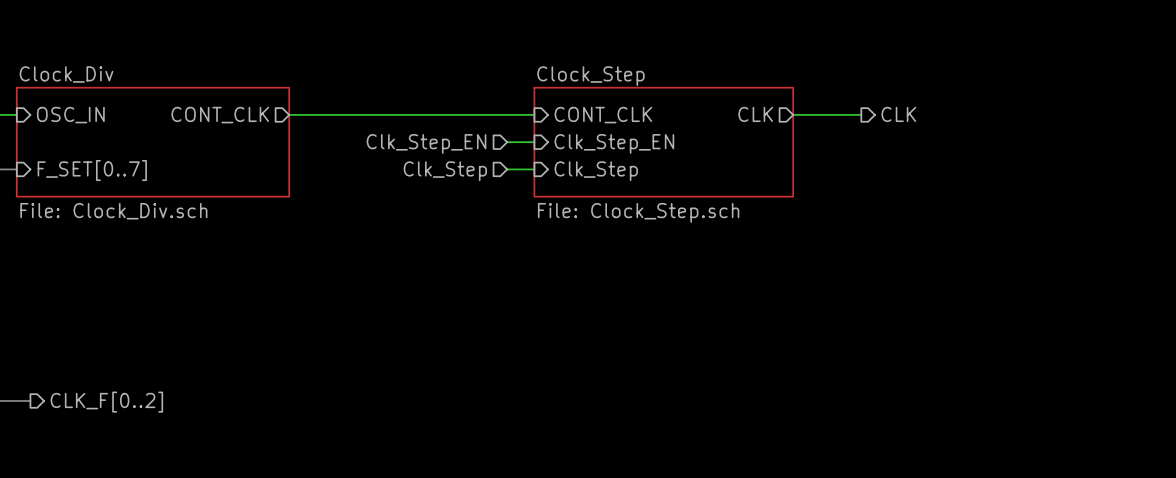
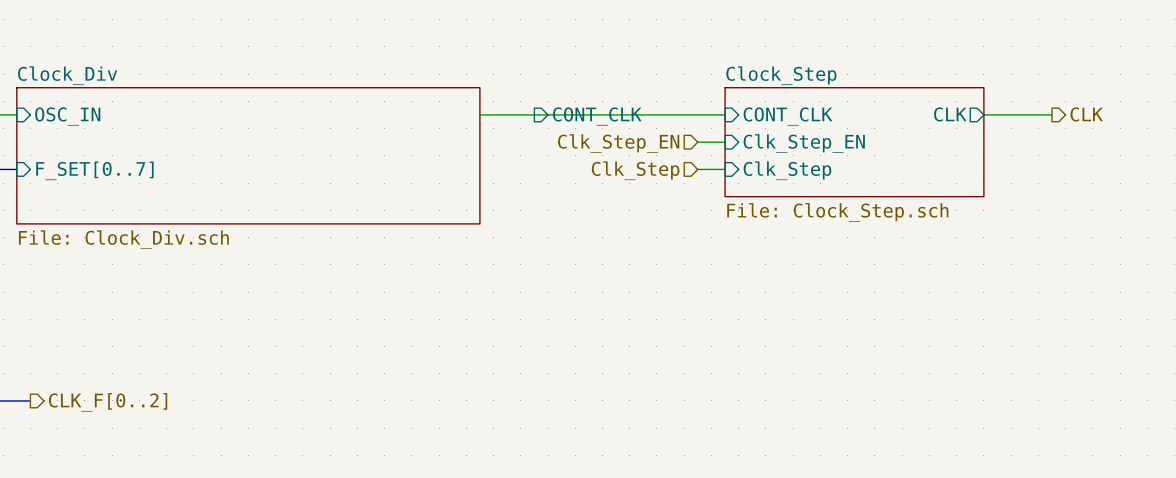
wire: (289, 114) (479, 114) -> (534, 114) (725, 114)
sheet pin position: CLK (755, 114) -> CLK (950, 114)
wire: (793, 114) (861, 114) -> (983, 114) (1051, 114)
hierarchical label position: CLK (898, 114) -> CLK (1086, 114)
sheet pin: CONT_CLK (220, 115) -> none
sheet pin: none -> CONT_CLK (787, 116)
sheet Clock_Div: File: Clock_Div.sch (153, 142) -> none
wire: (507, 142) (534, 142) -> (697, 142) (725, 142)
sheet Clock_Step position: (663, 142) -> (854, 142)
hierarchical label position: Clk_Step_EN (426, 143) -> Clk_Step_EN (618, 143)
sheet pin position: Clk_Step_EN (614, 143) -> Clk_Step_EN (804, 143)
sheet Clock_Div: none -> File: Clock_Div.sch (248, 155)
wire: (507, 169) (534, 169) -> (697, 169) (725, 169)
hierarchical label position: Clk_Step (445, 171) -> Clk_Step (635, 170)
sheet pin position: Clk_Step (596, 171) -> Clk_Step (787, 170)

